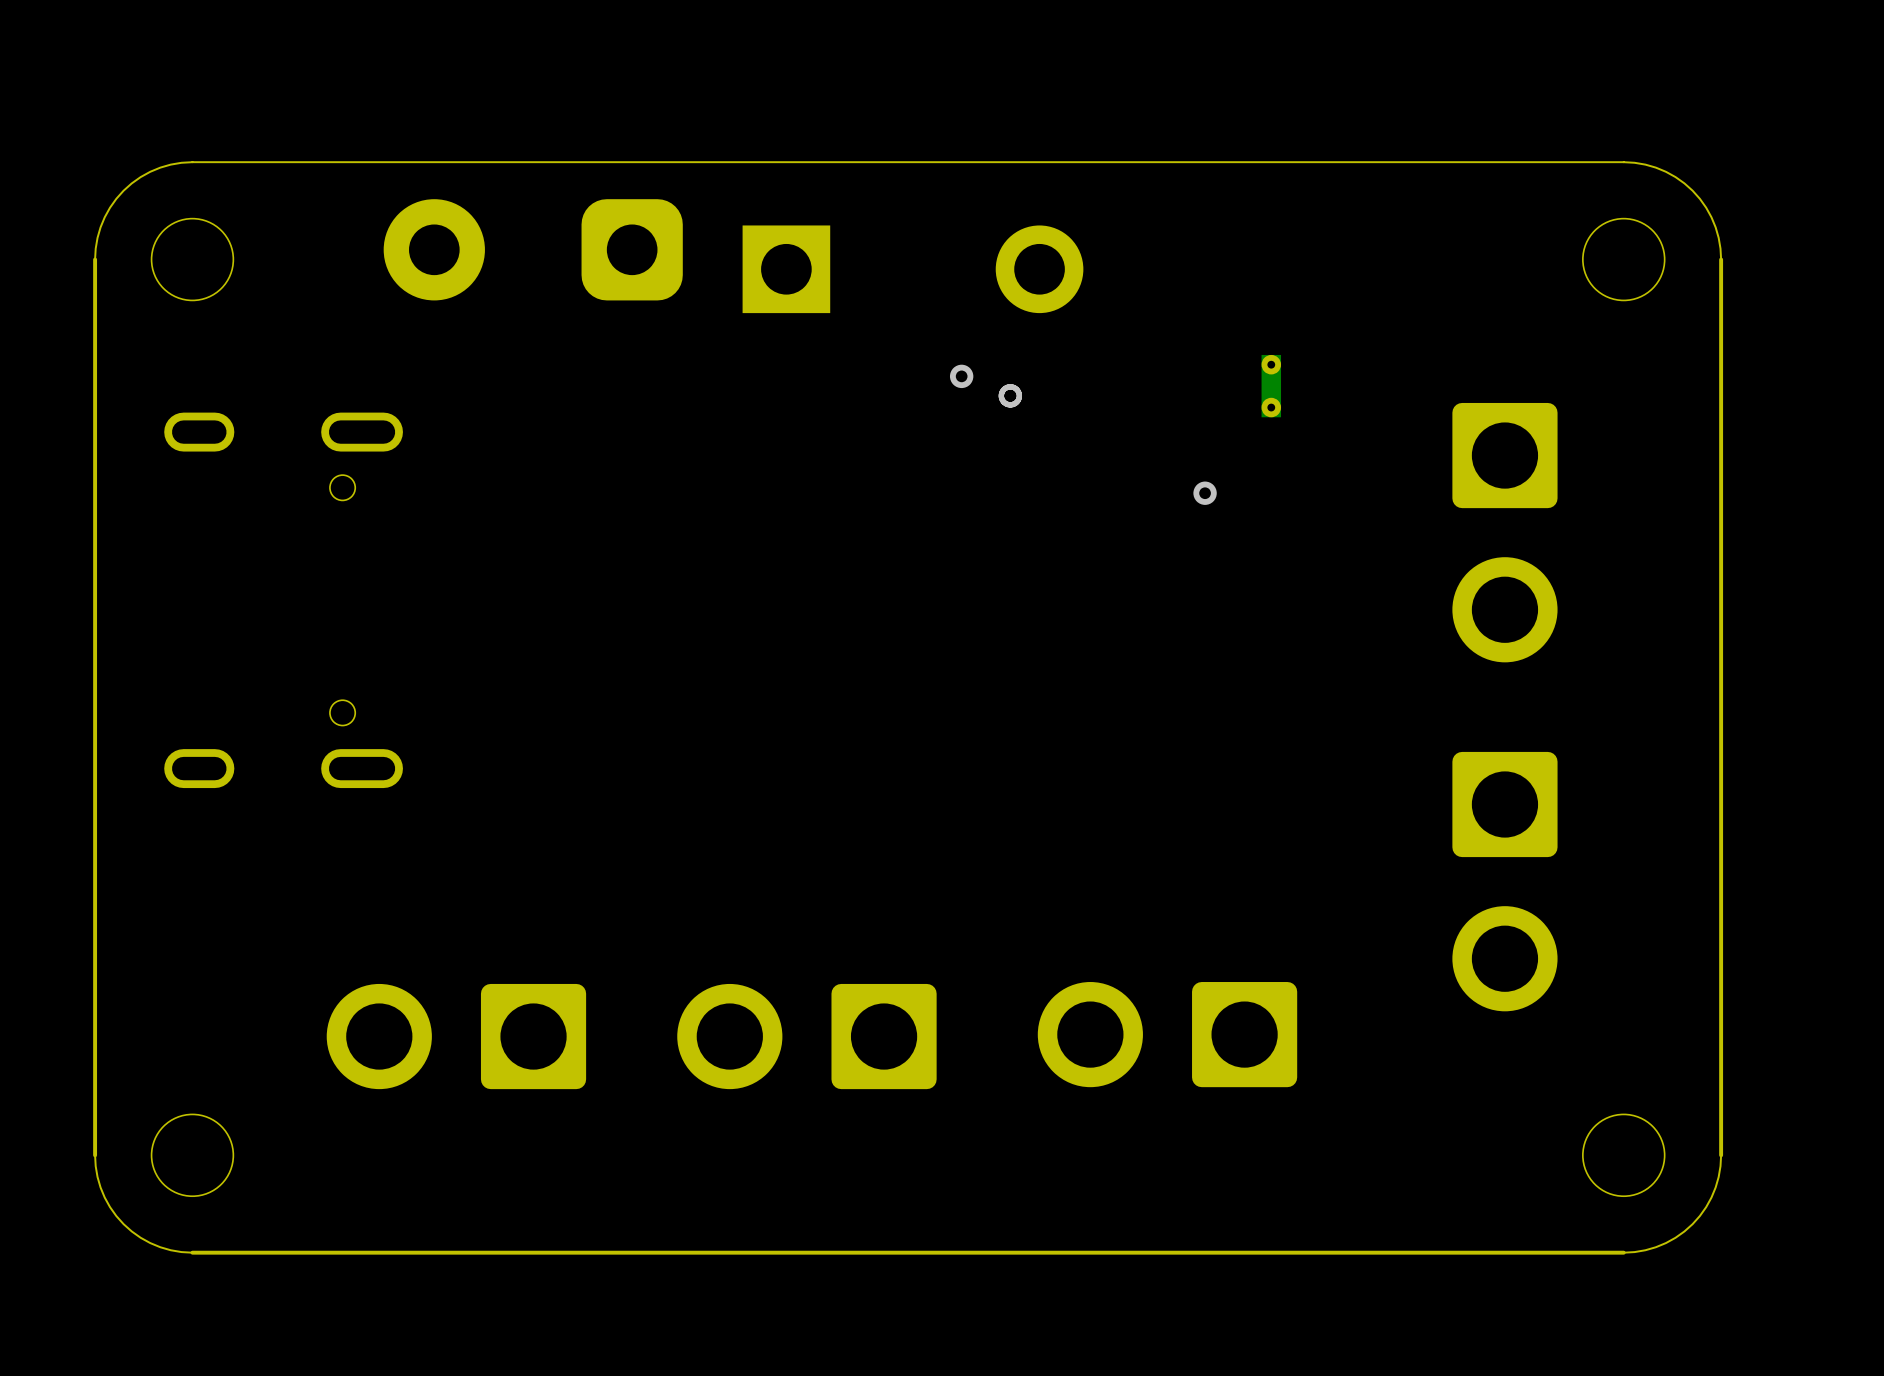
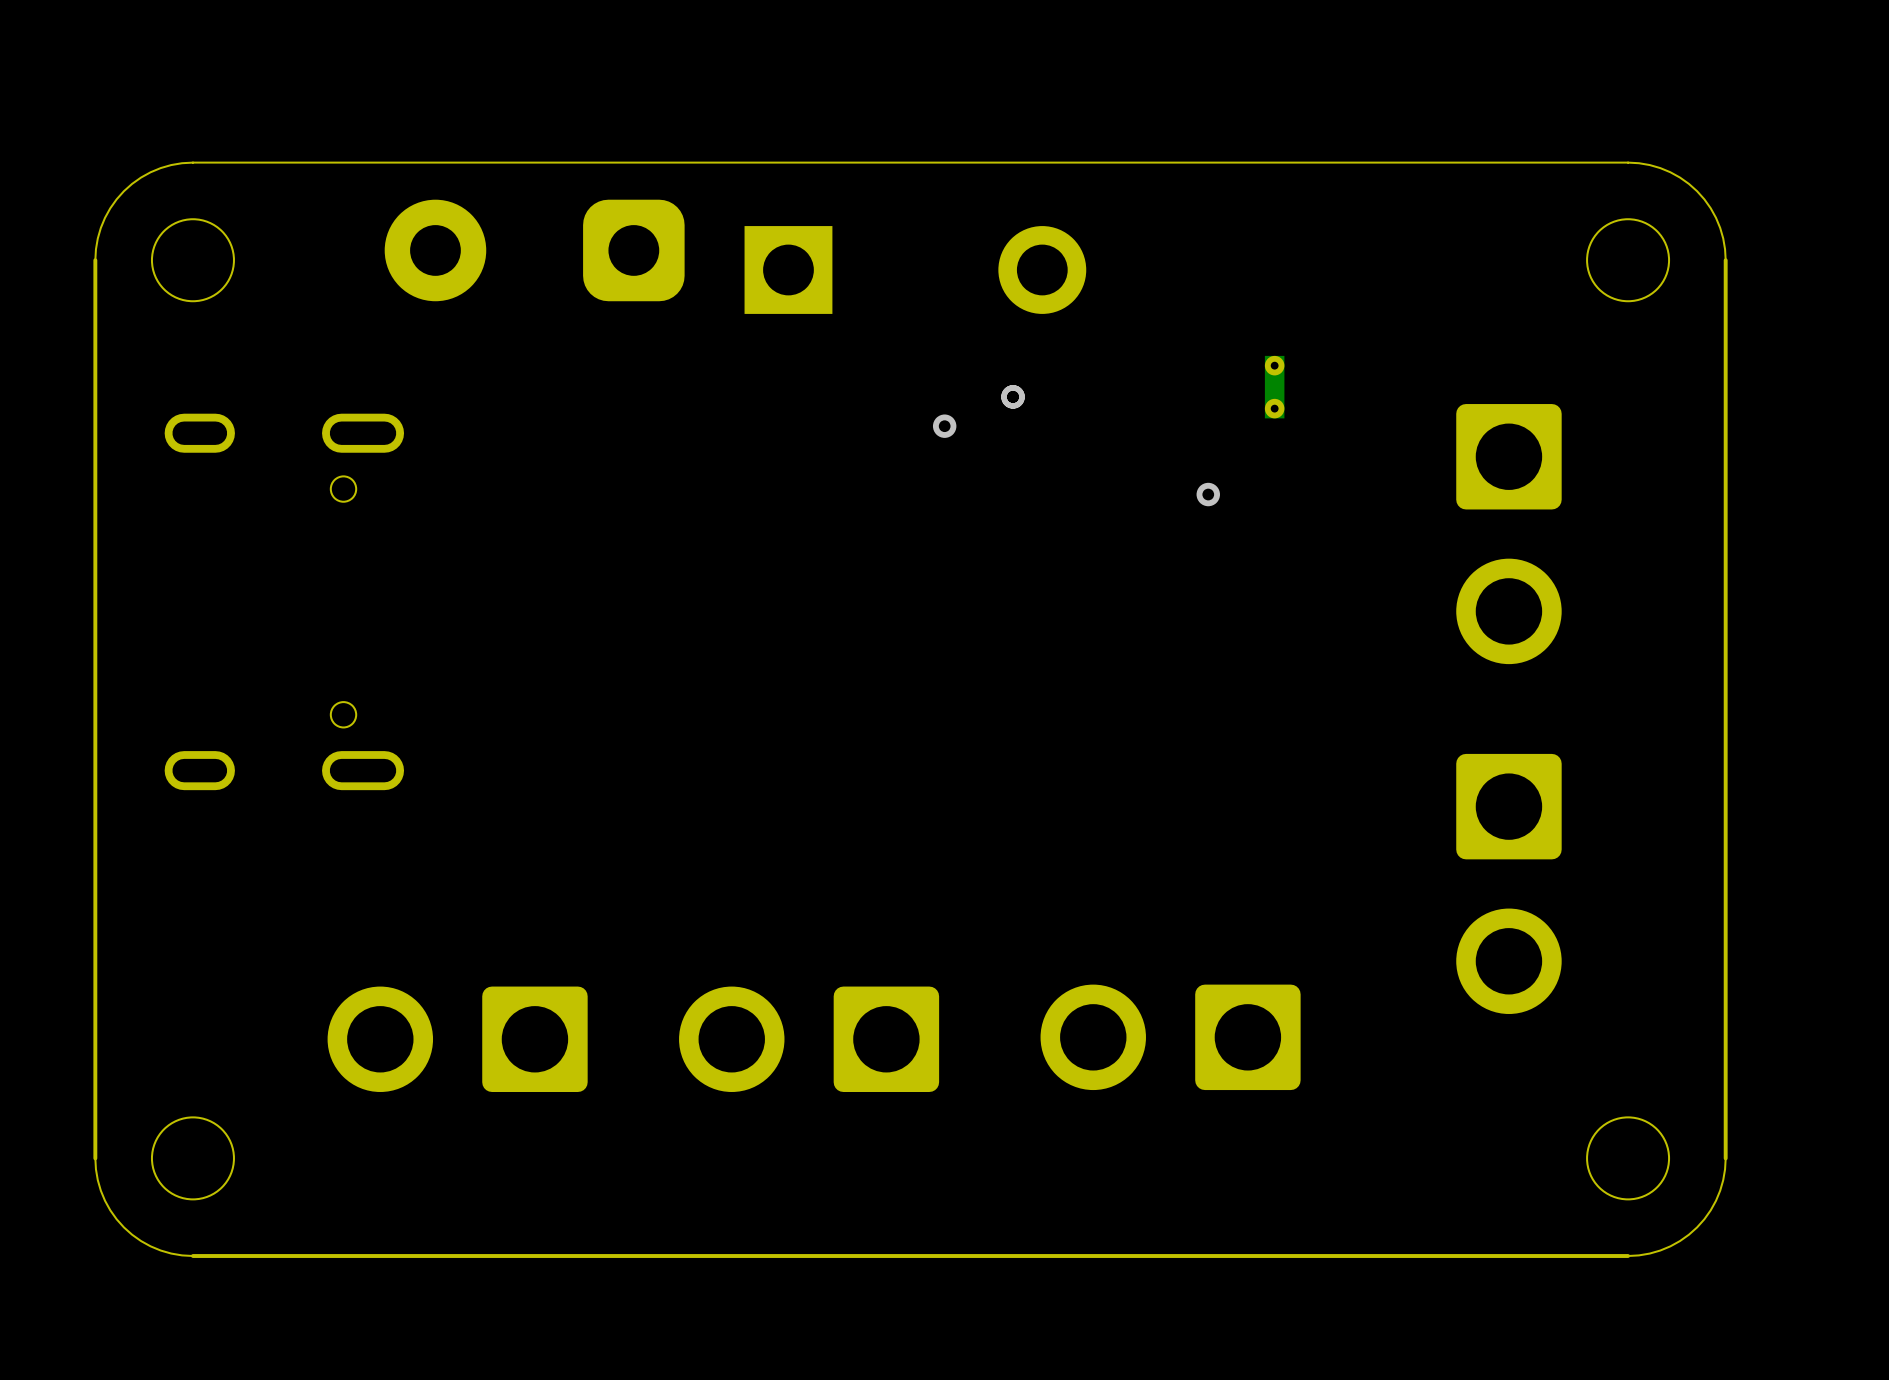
via position: (961, 376) -> (944, 426)

